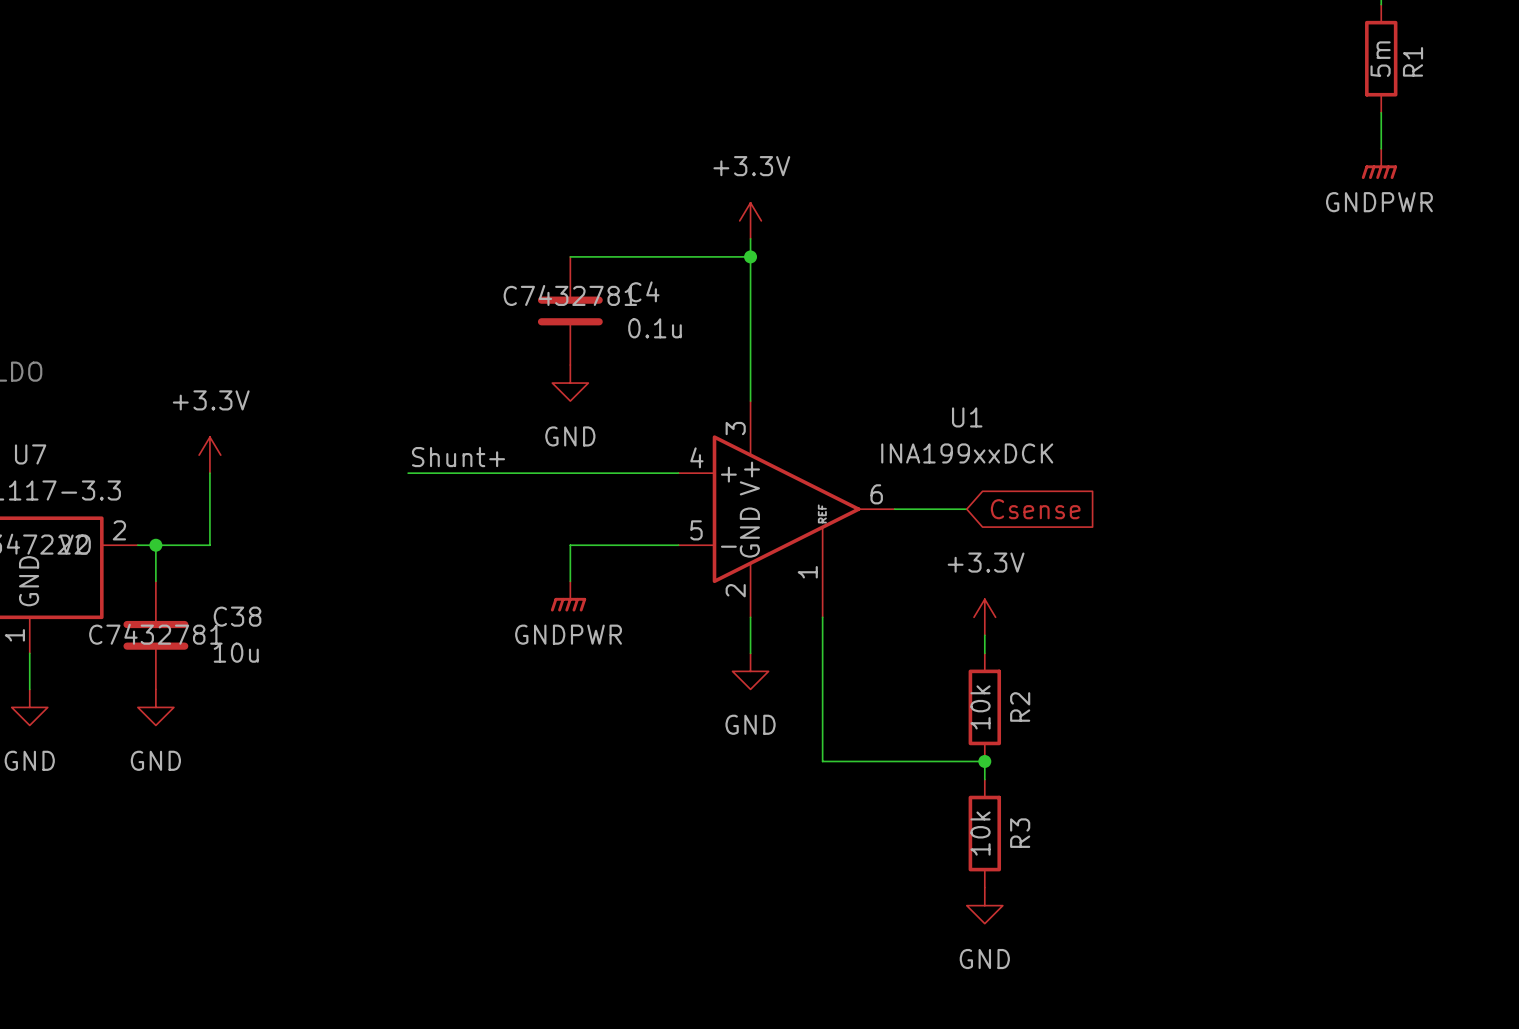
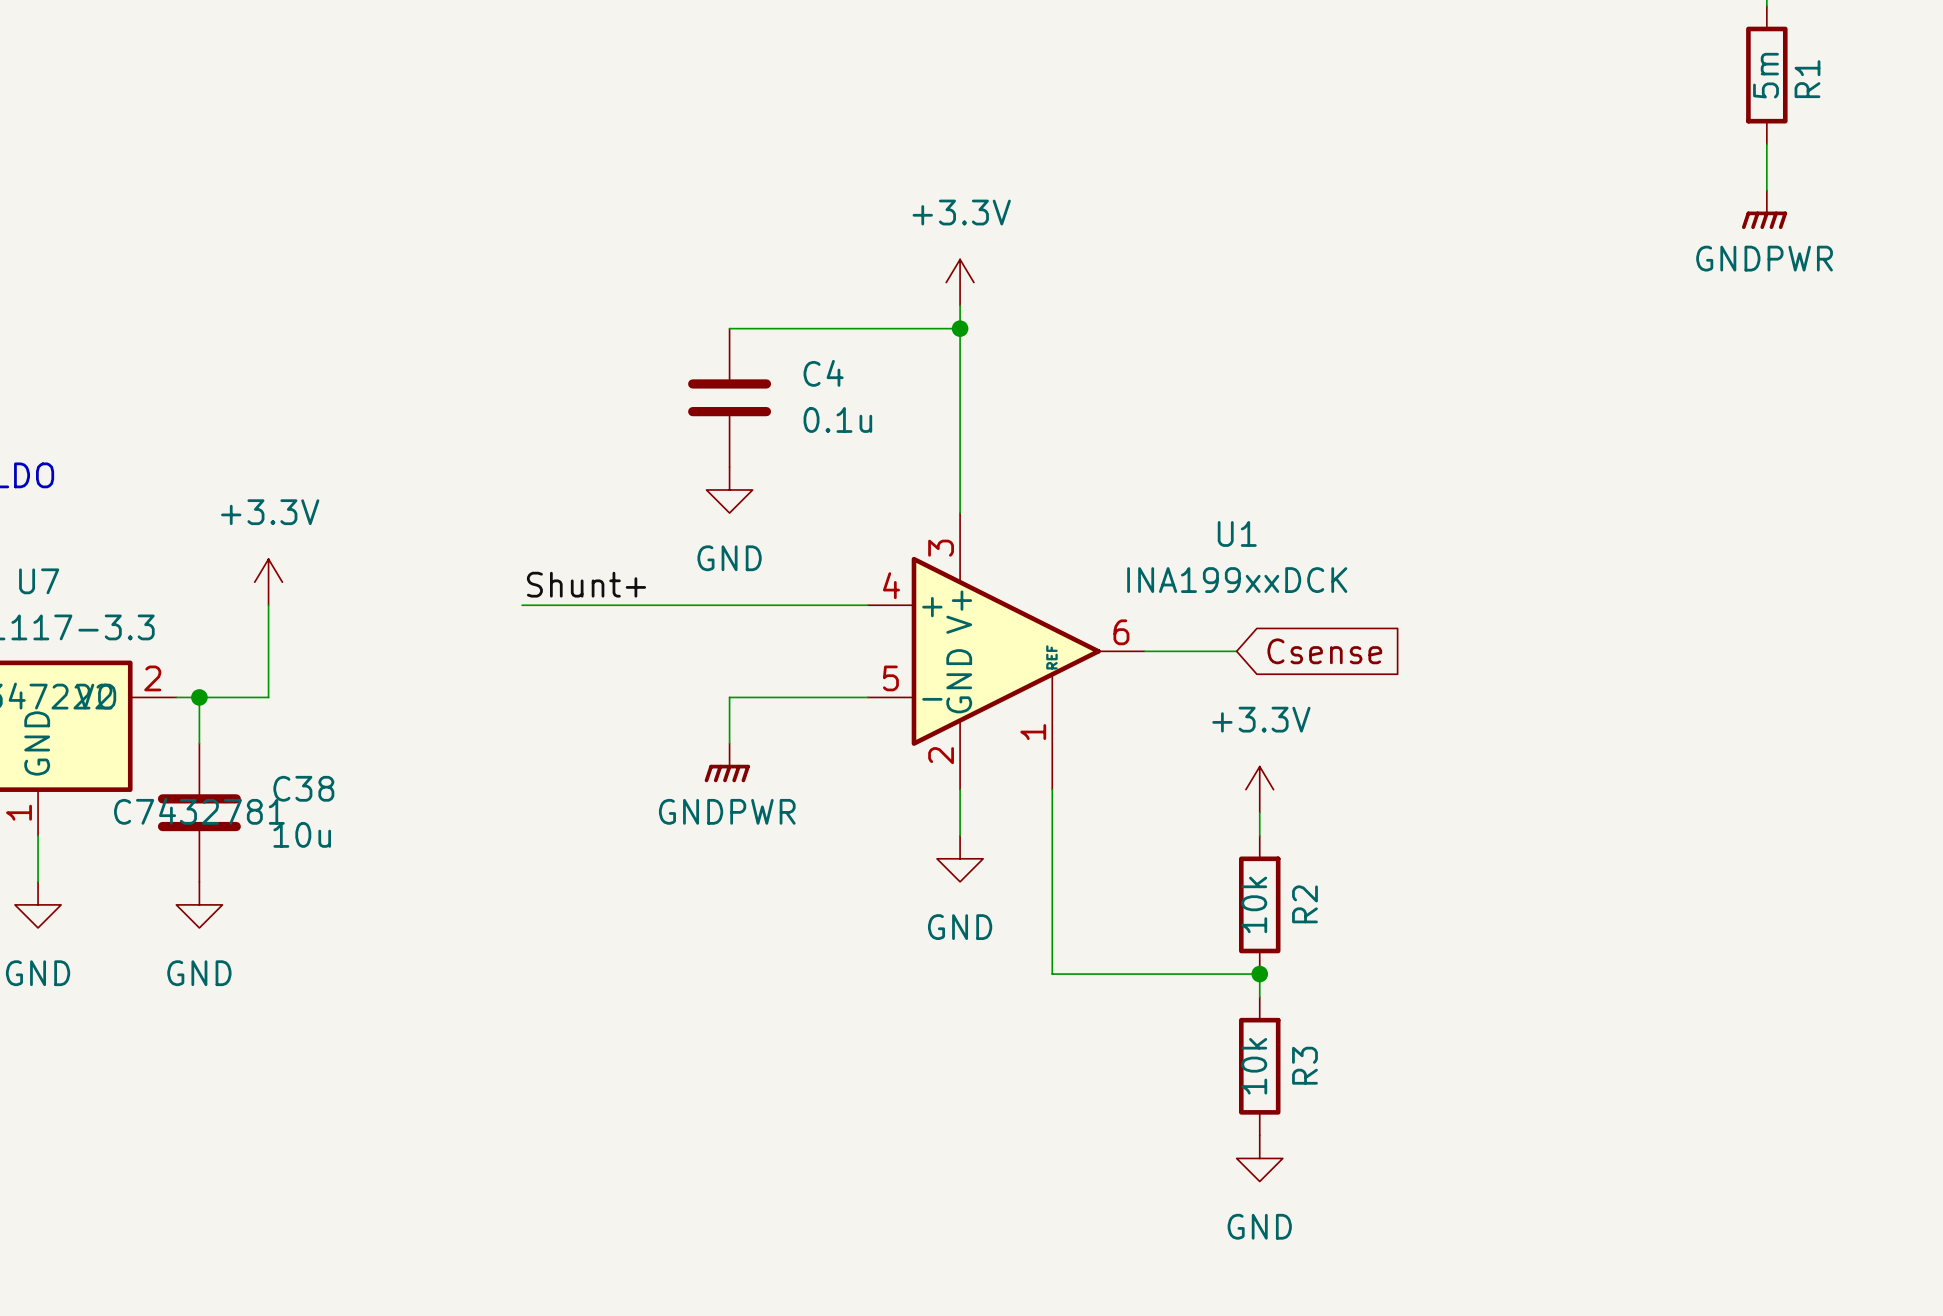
C4 text: C7432781 (570, 295) -> none

